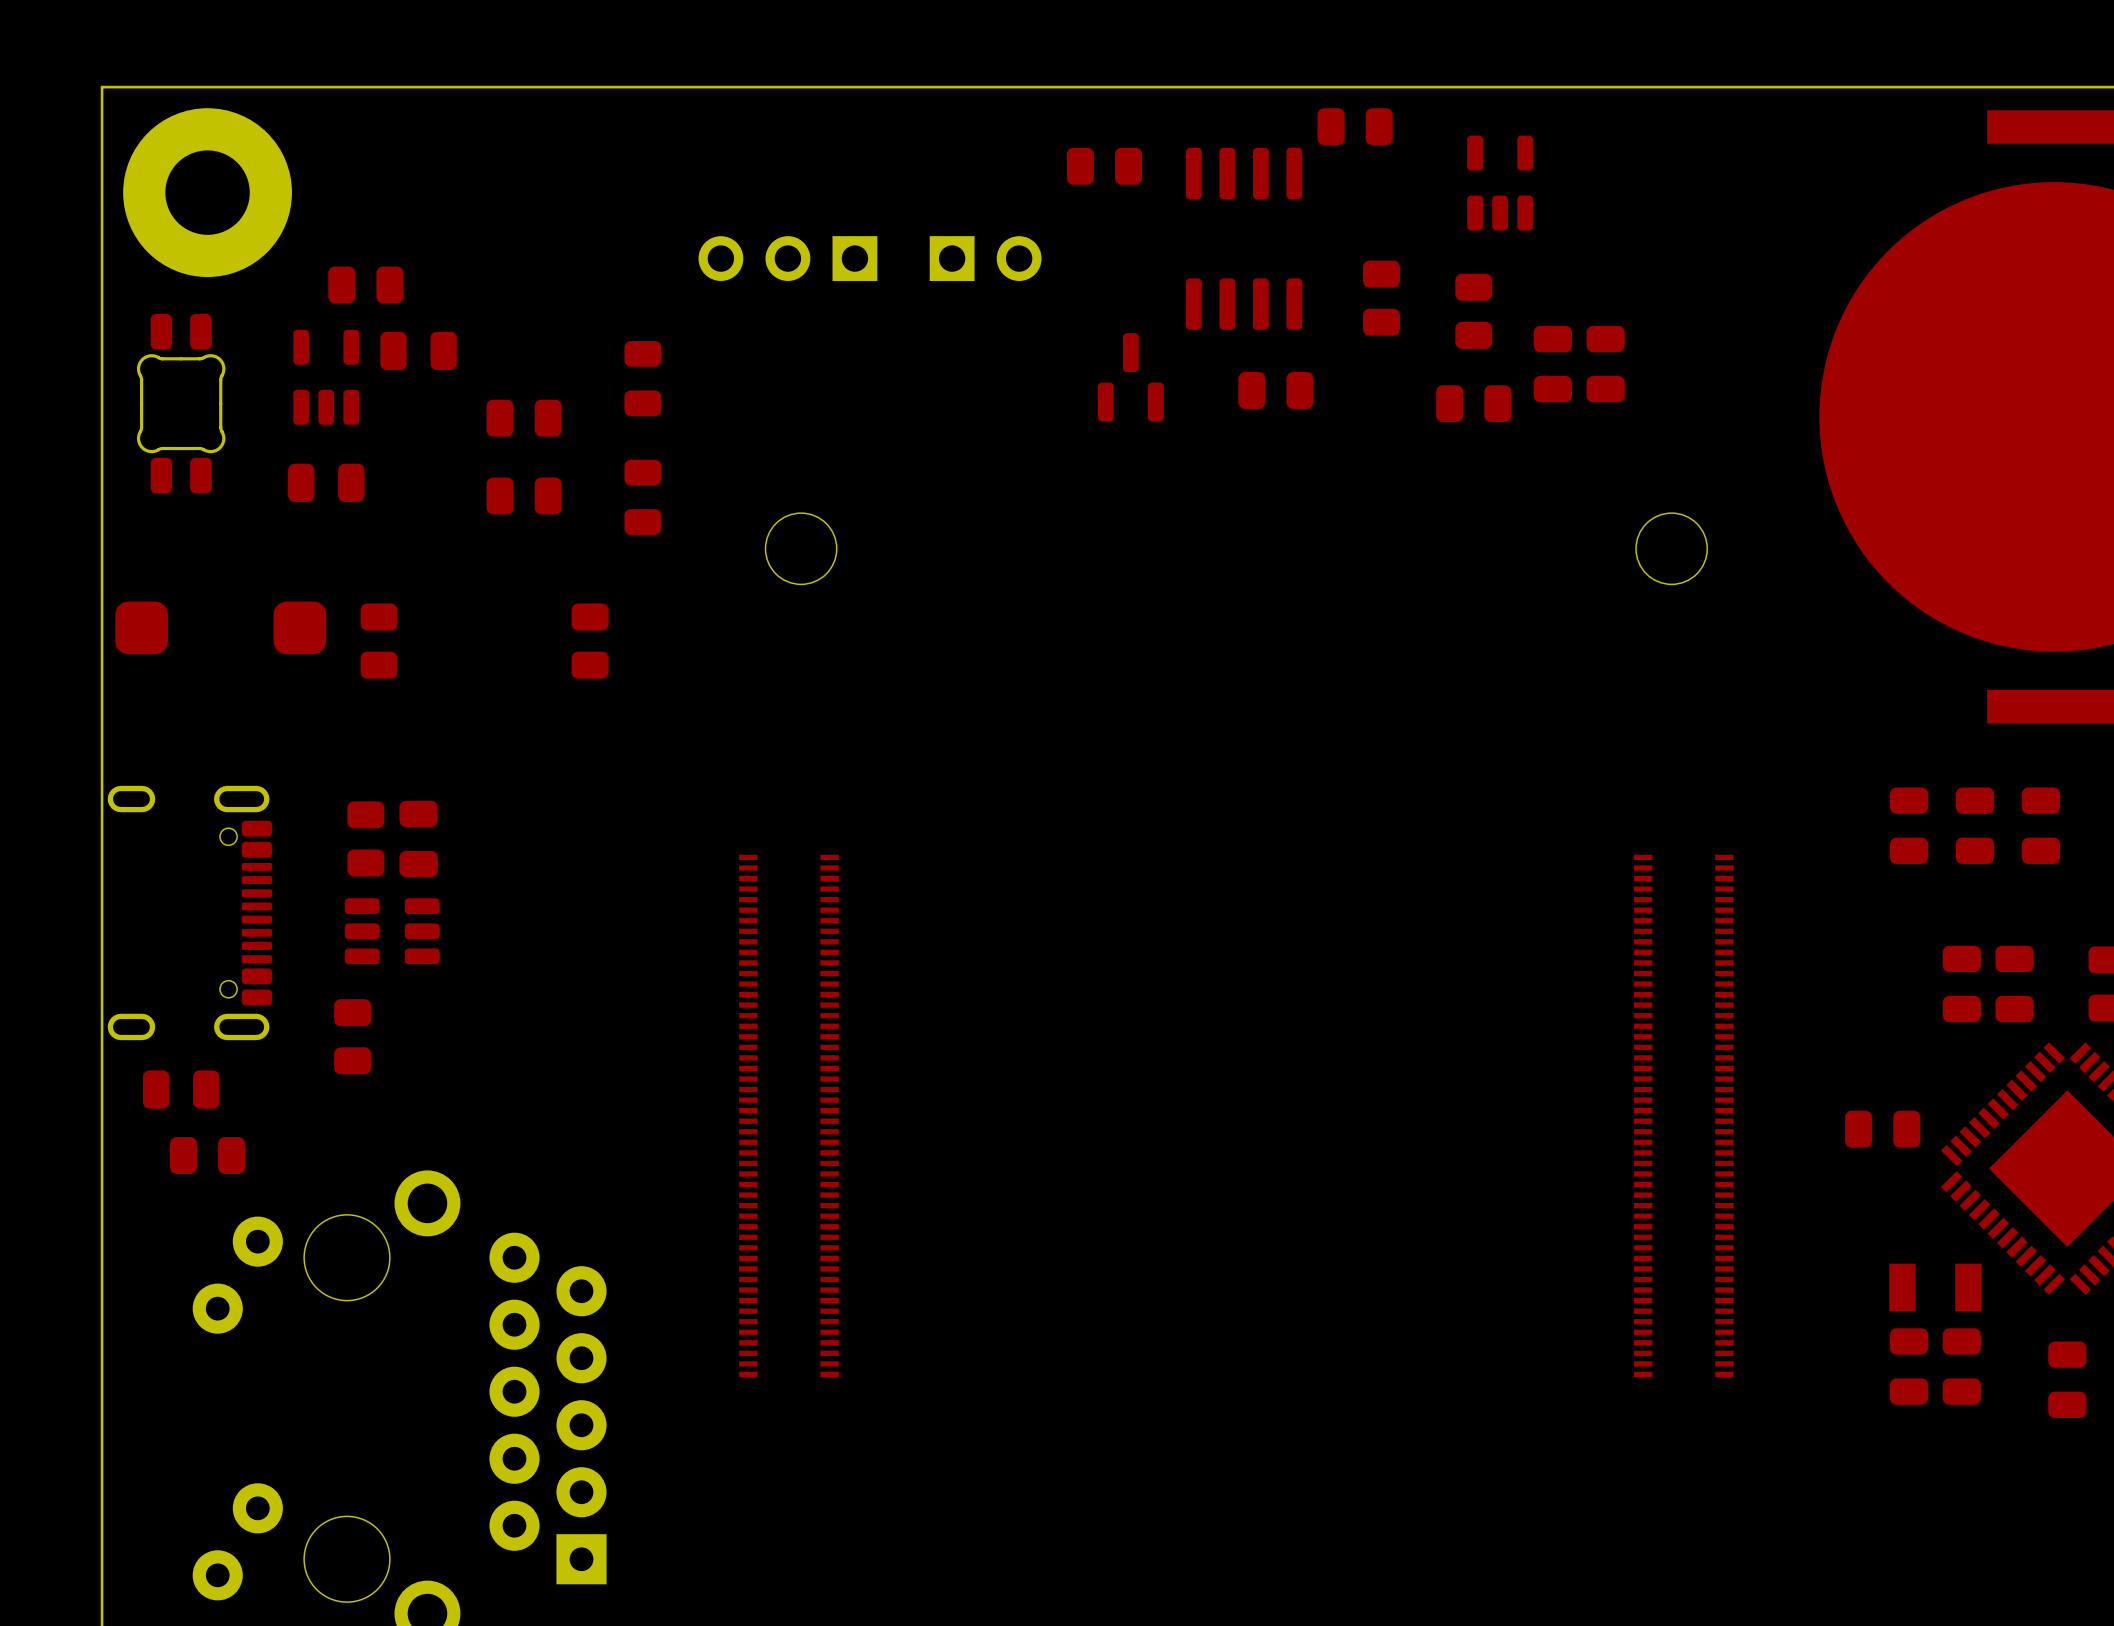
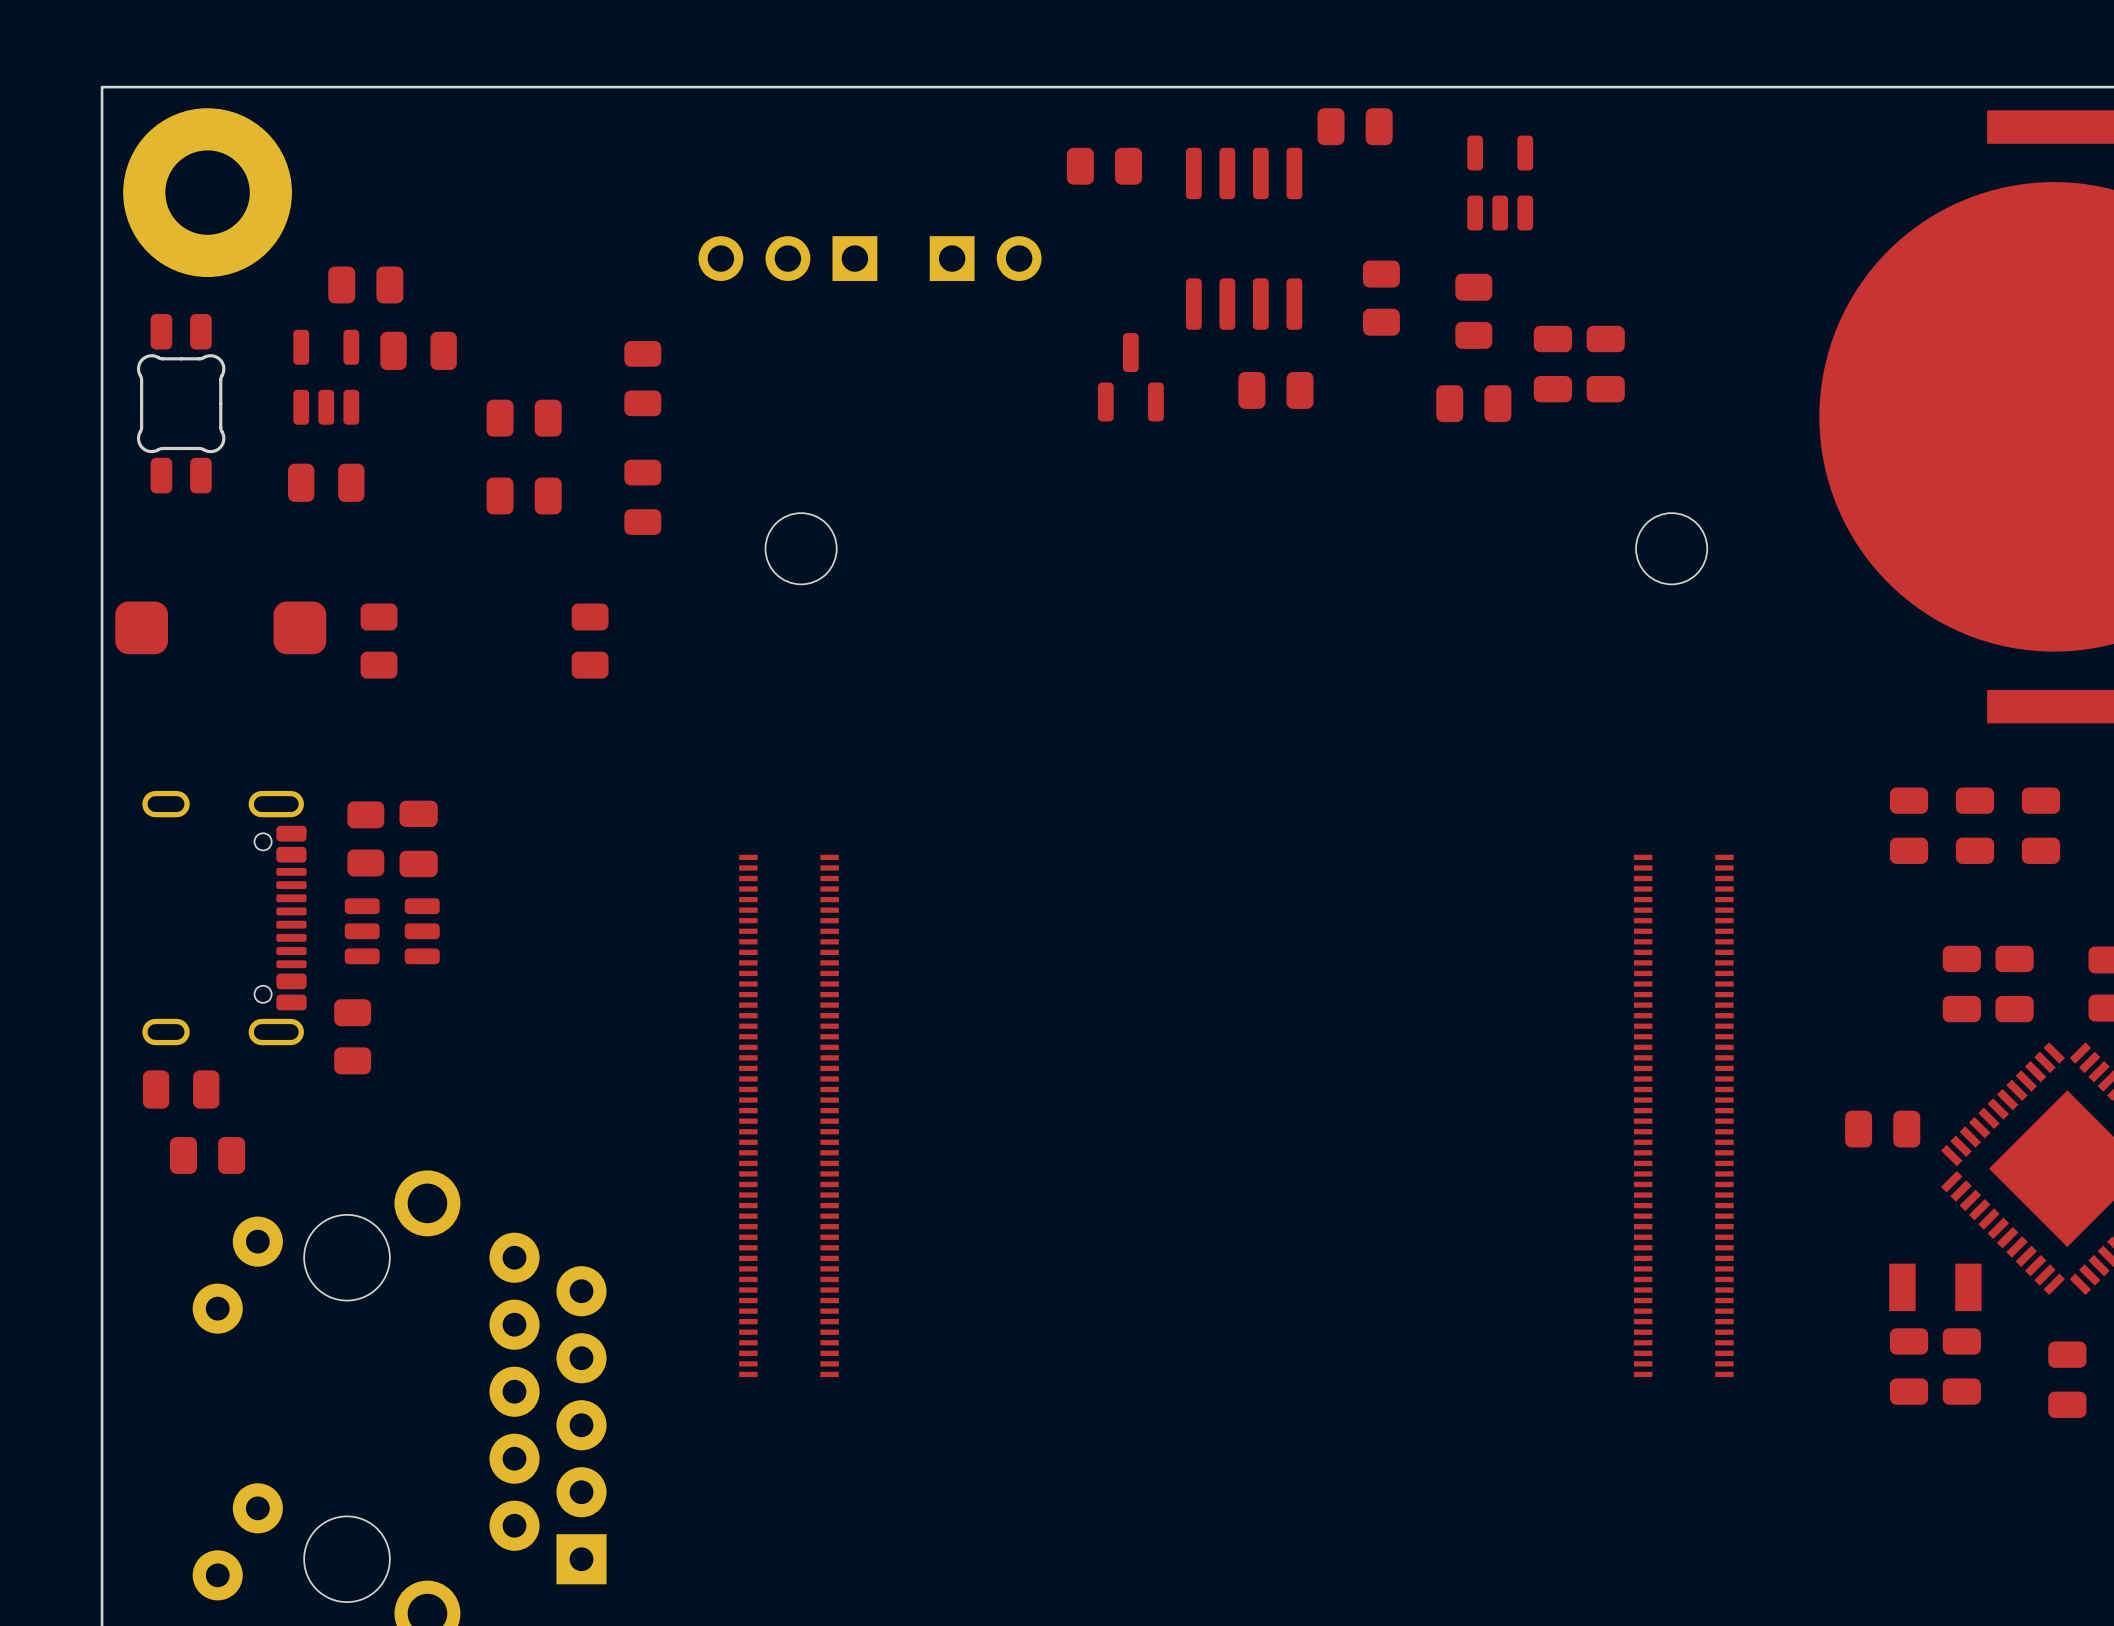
part position: (189, 912) -> (224, 918)

